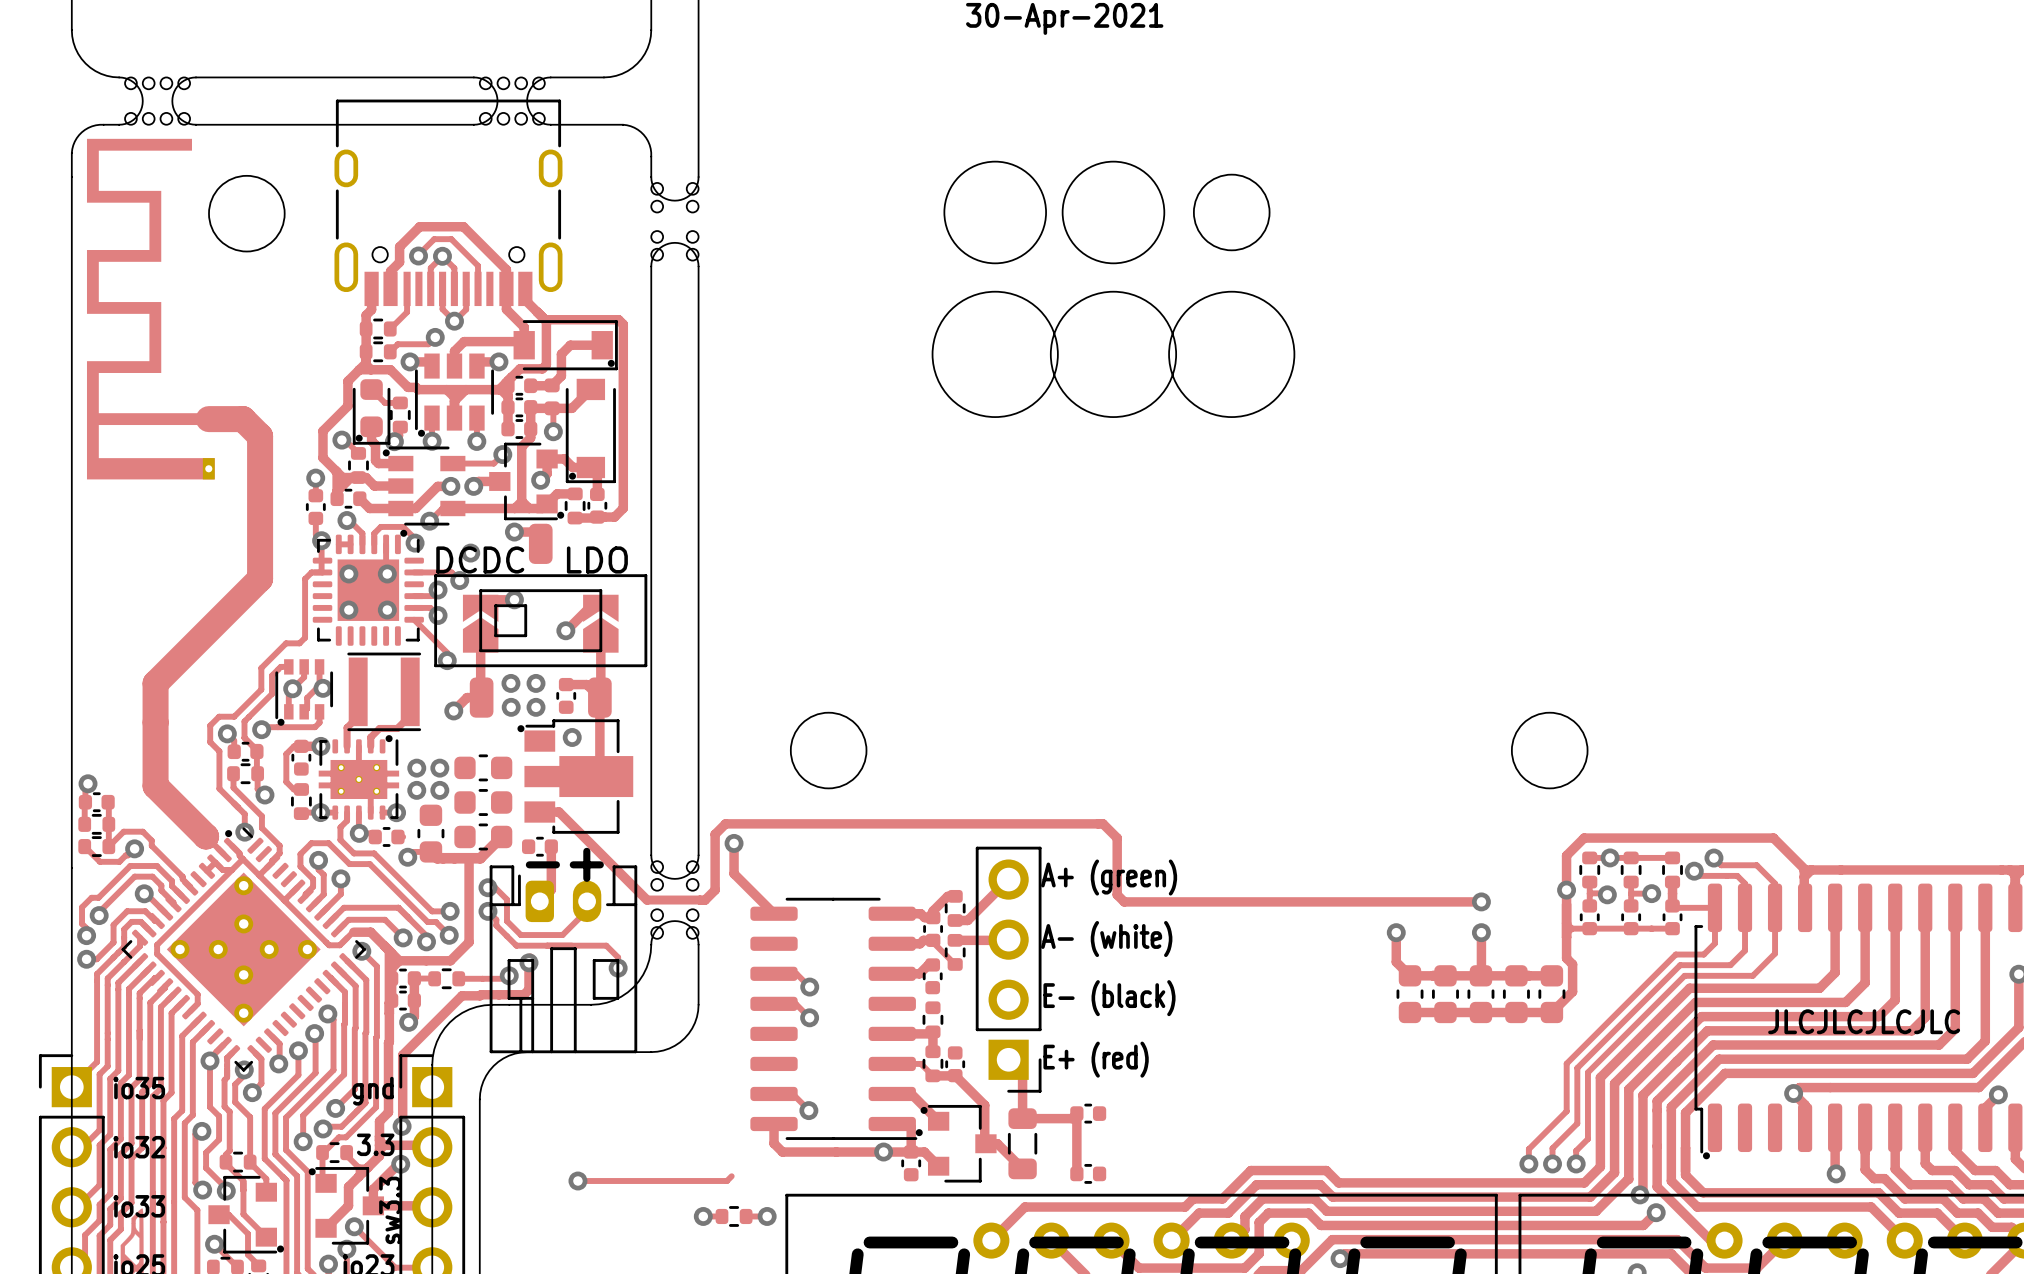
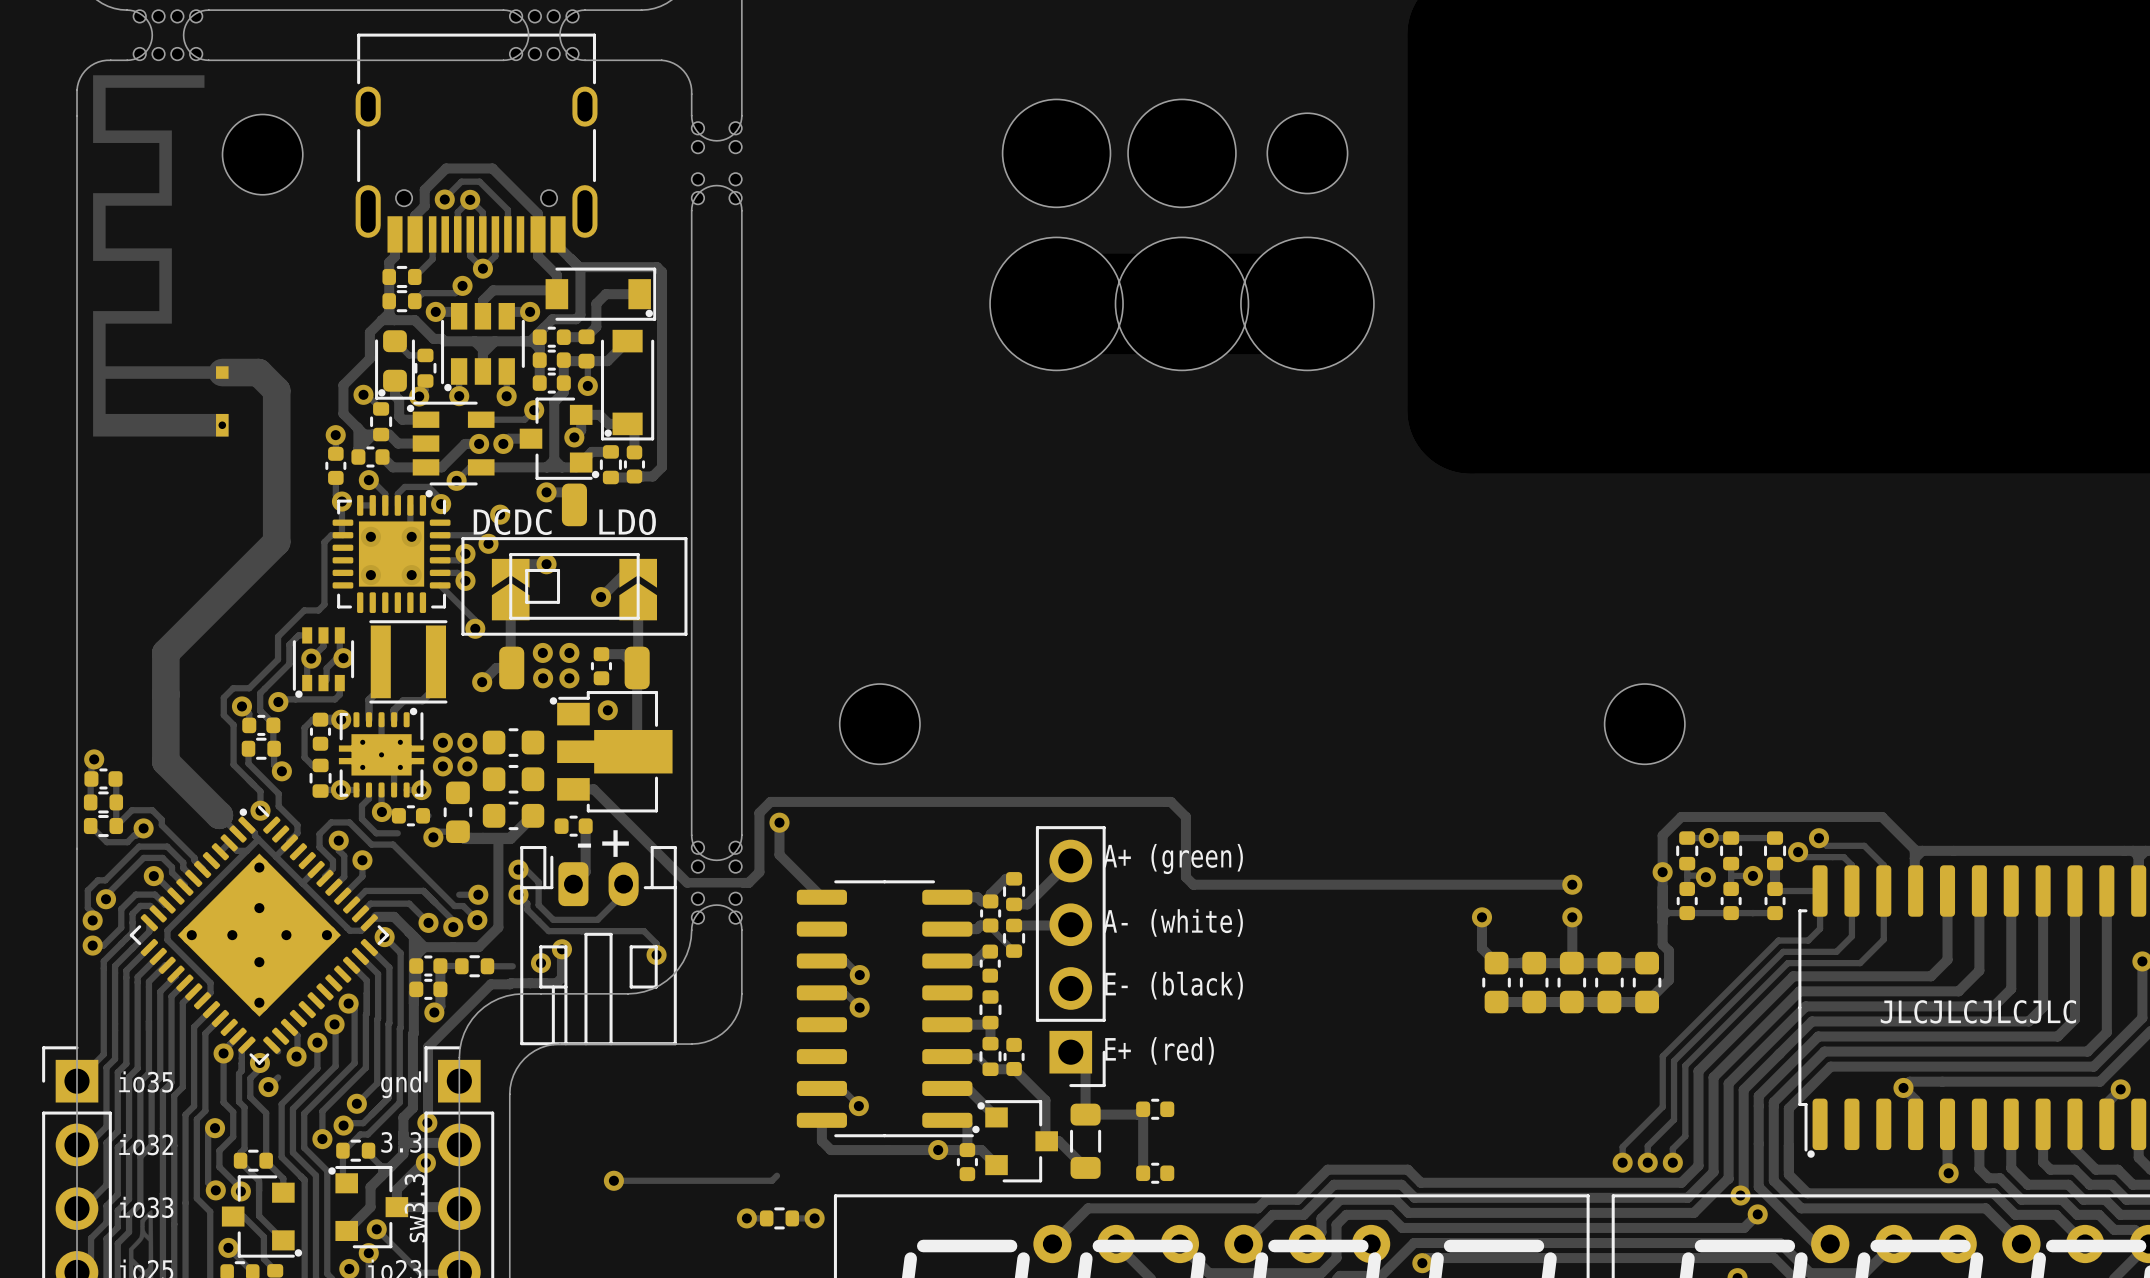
track: (374, 853) (432, 911) -> none
track: (482, 978) (504, 978) -> none
track: (261, 1059) (261, 1083) -> none

